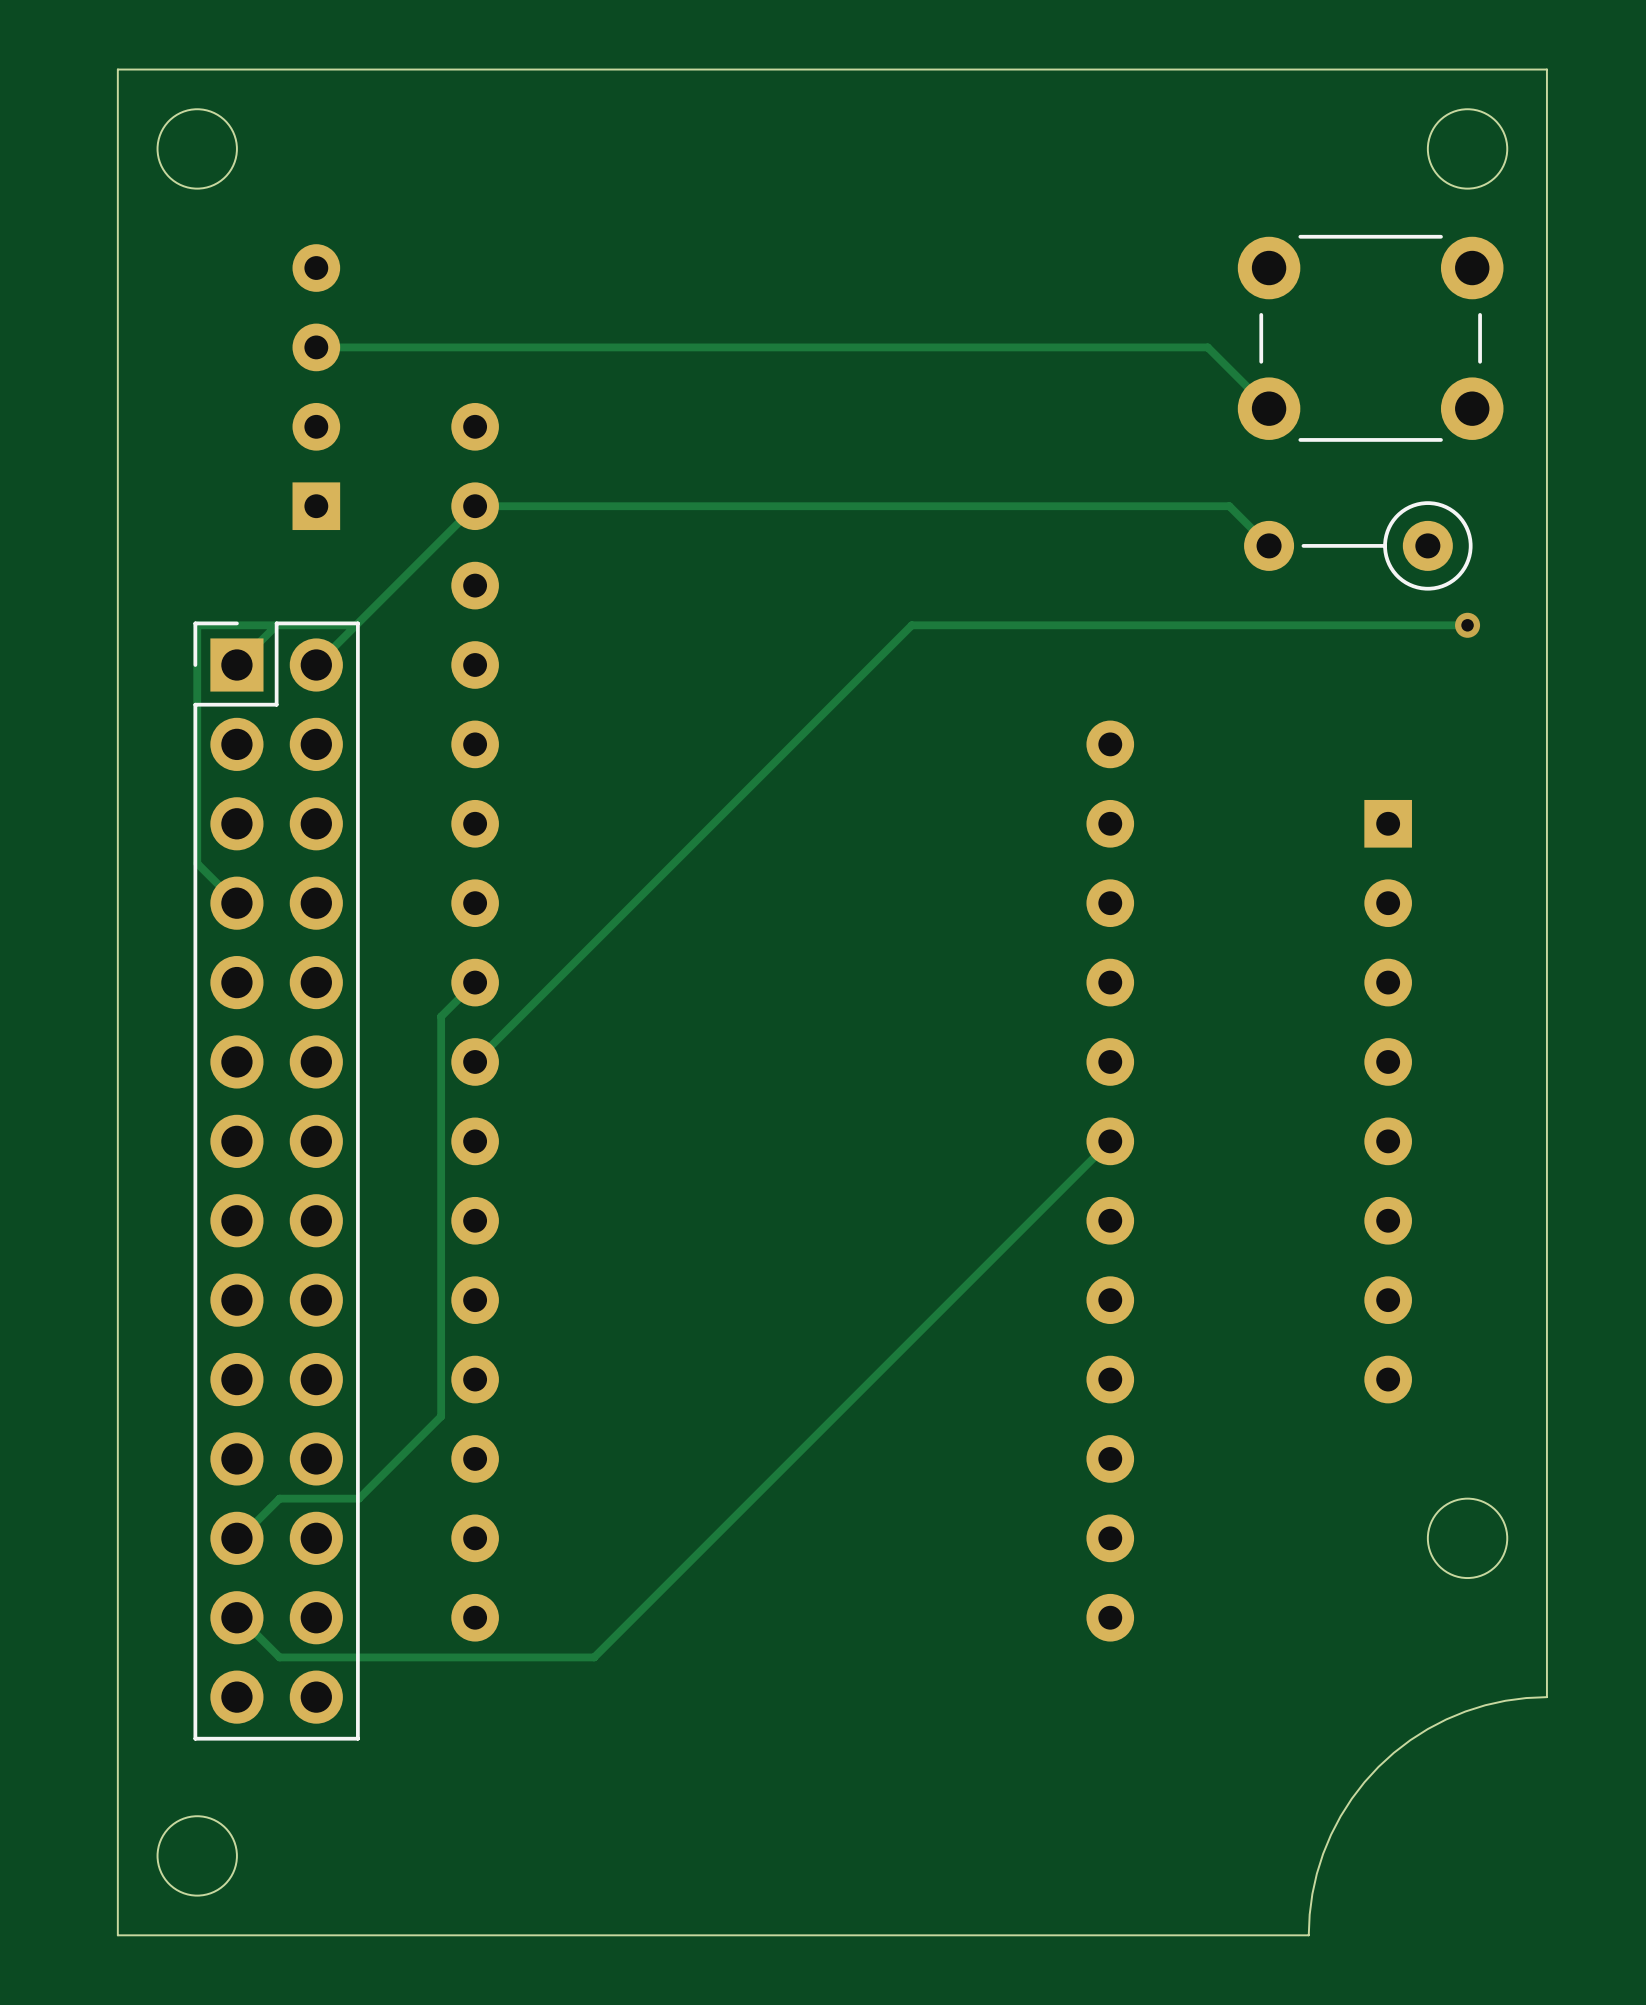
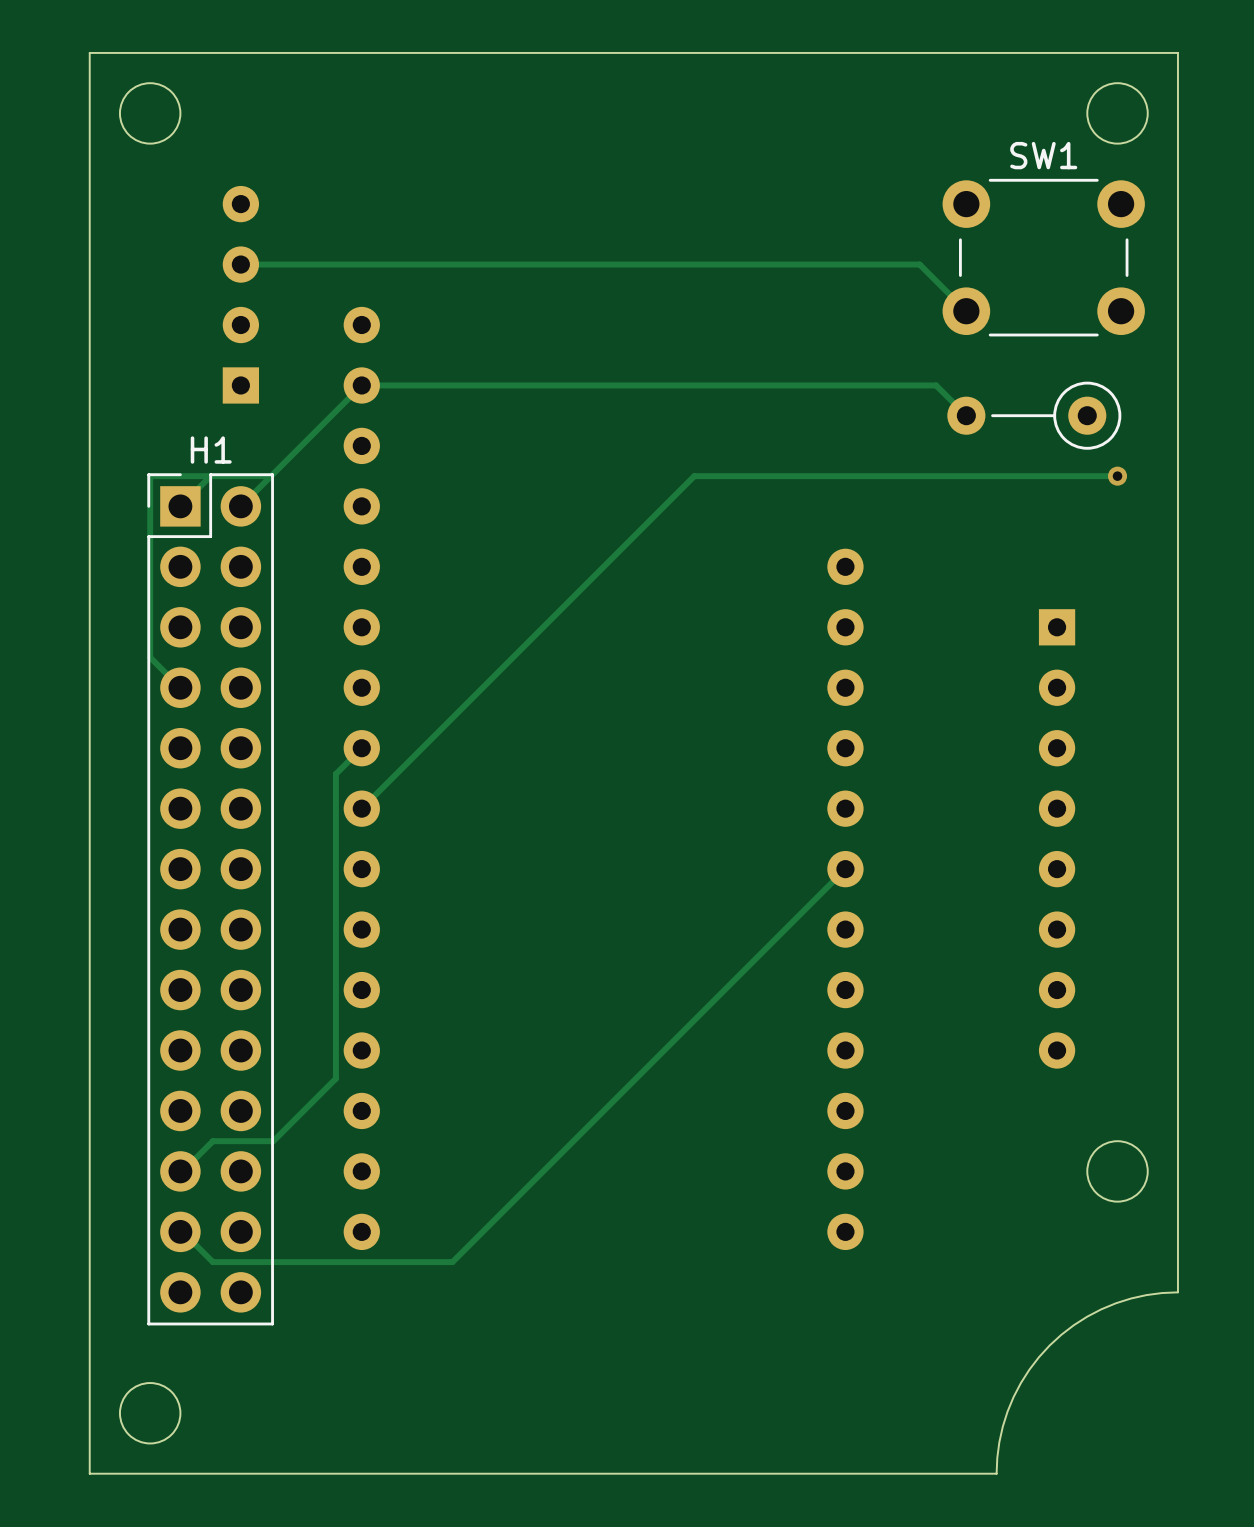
SW1 name: none -> SW1 (1043, 155)
H1 name: none -> H1 (211, 450)

